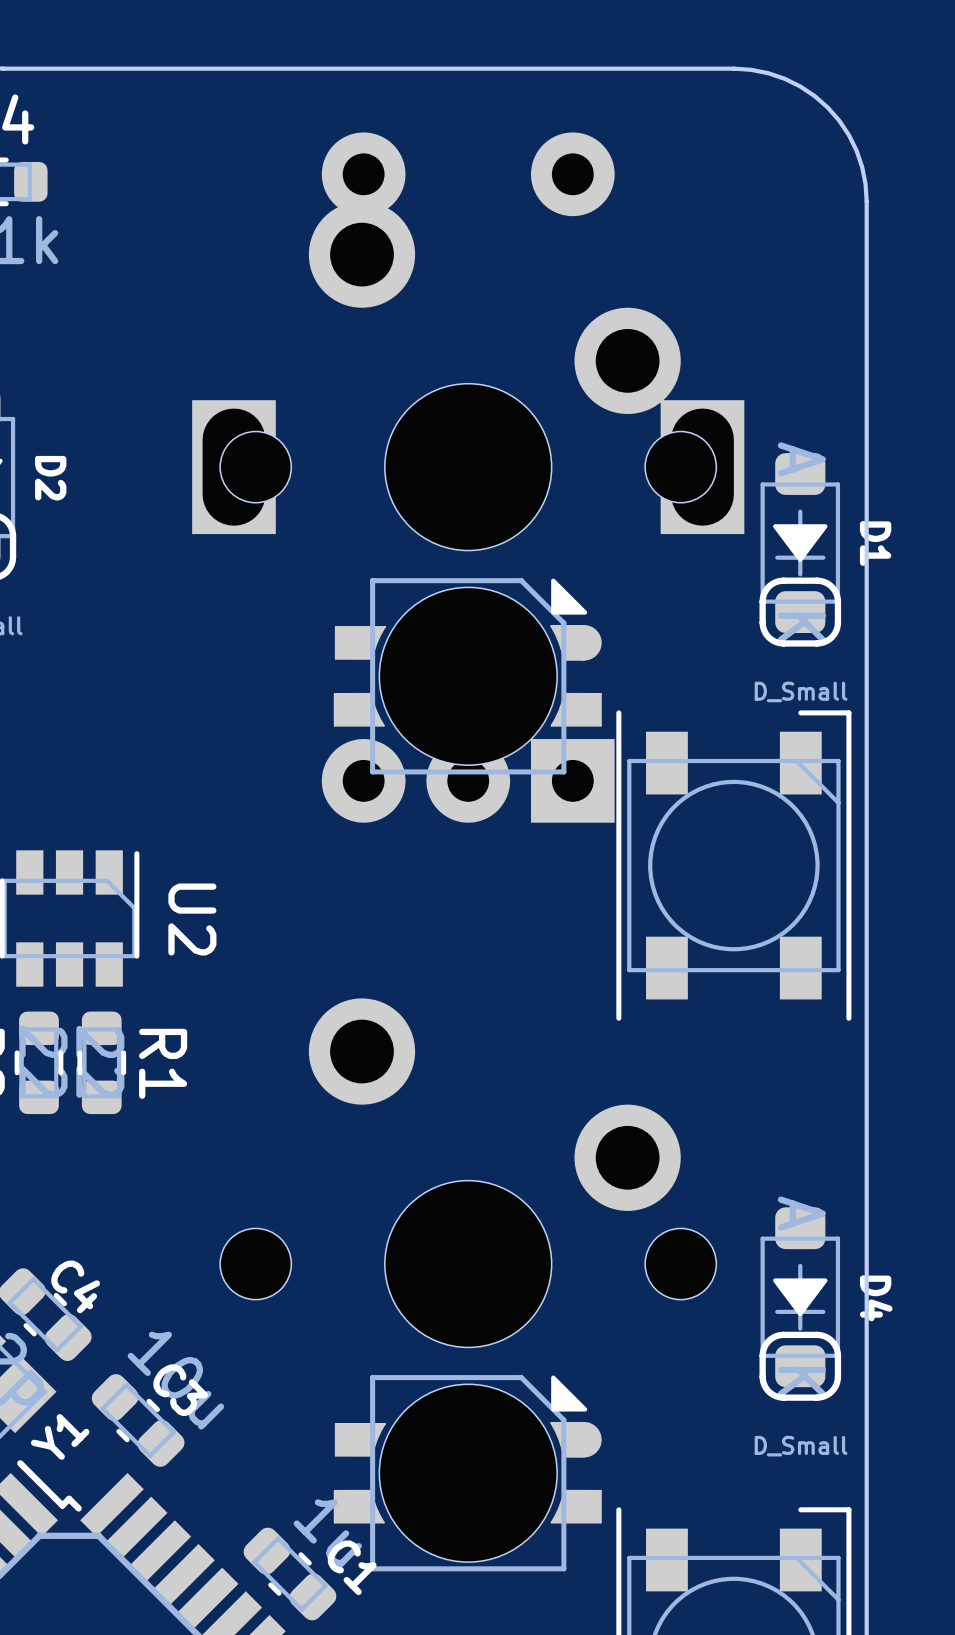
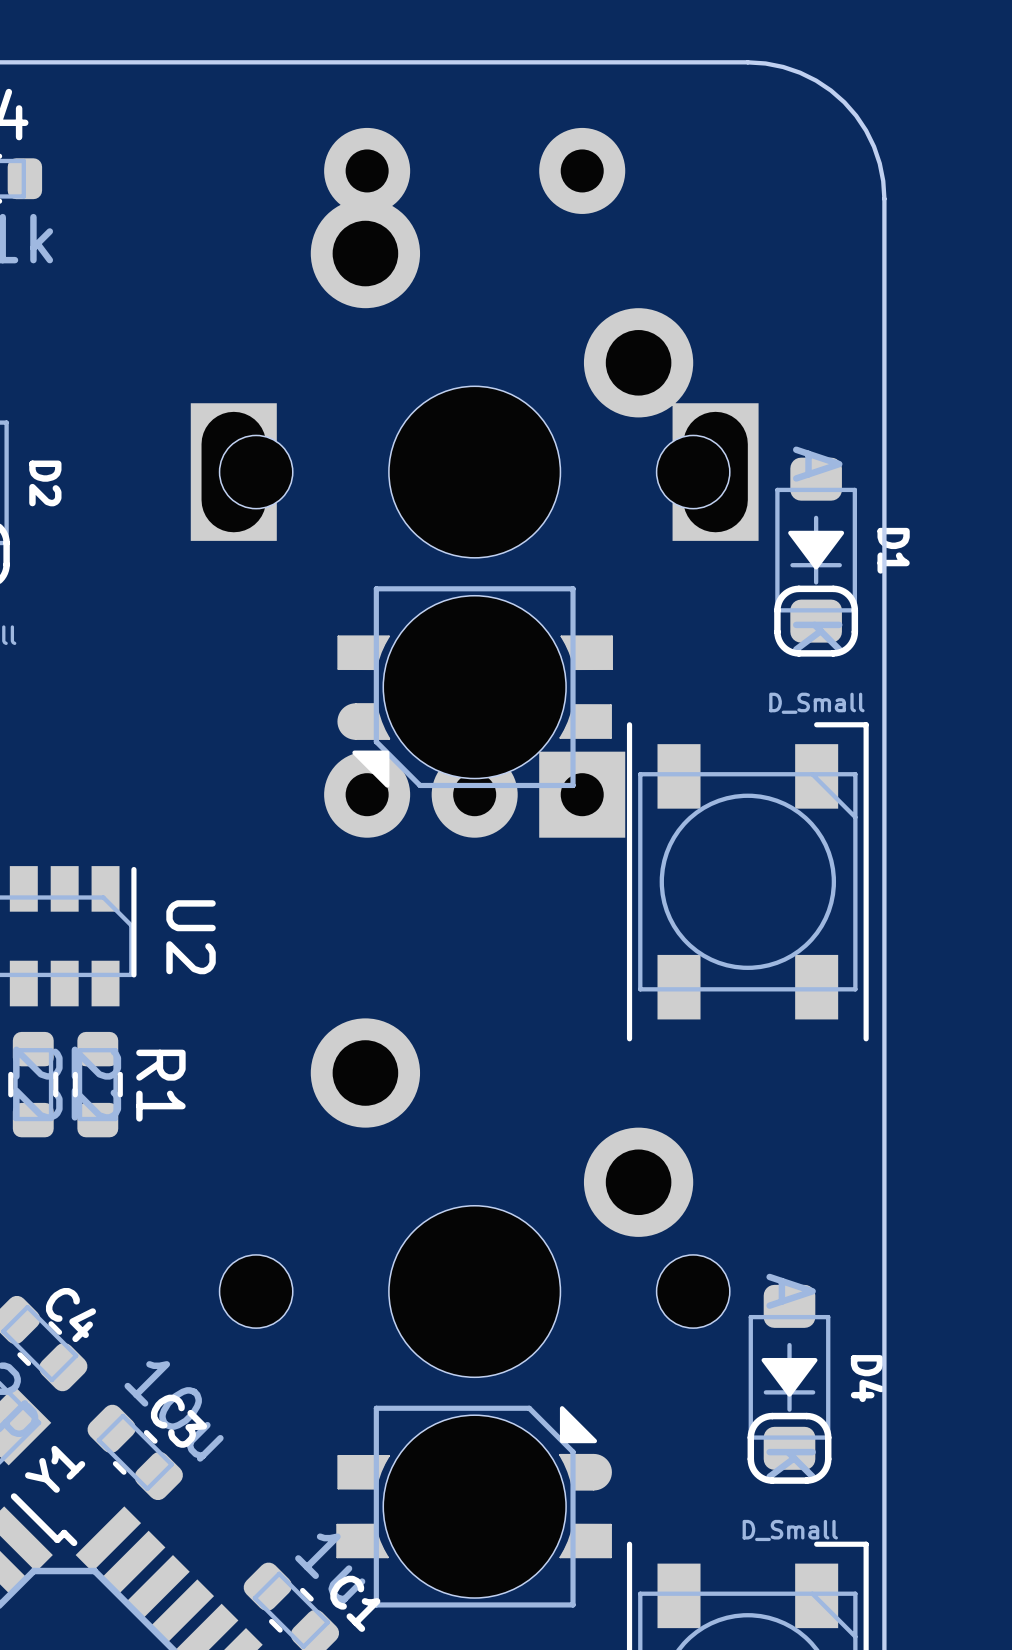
part rotation: 0° (467, 676) -> 180° (475, 687)
D4 position: (800, 1304) -> (789, 1384)

